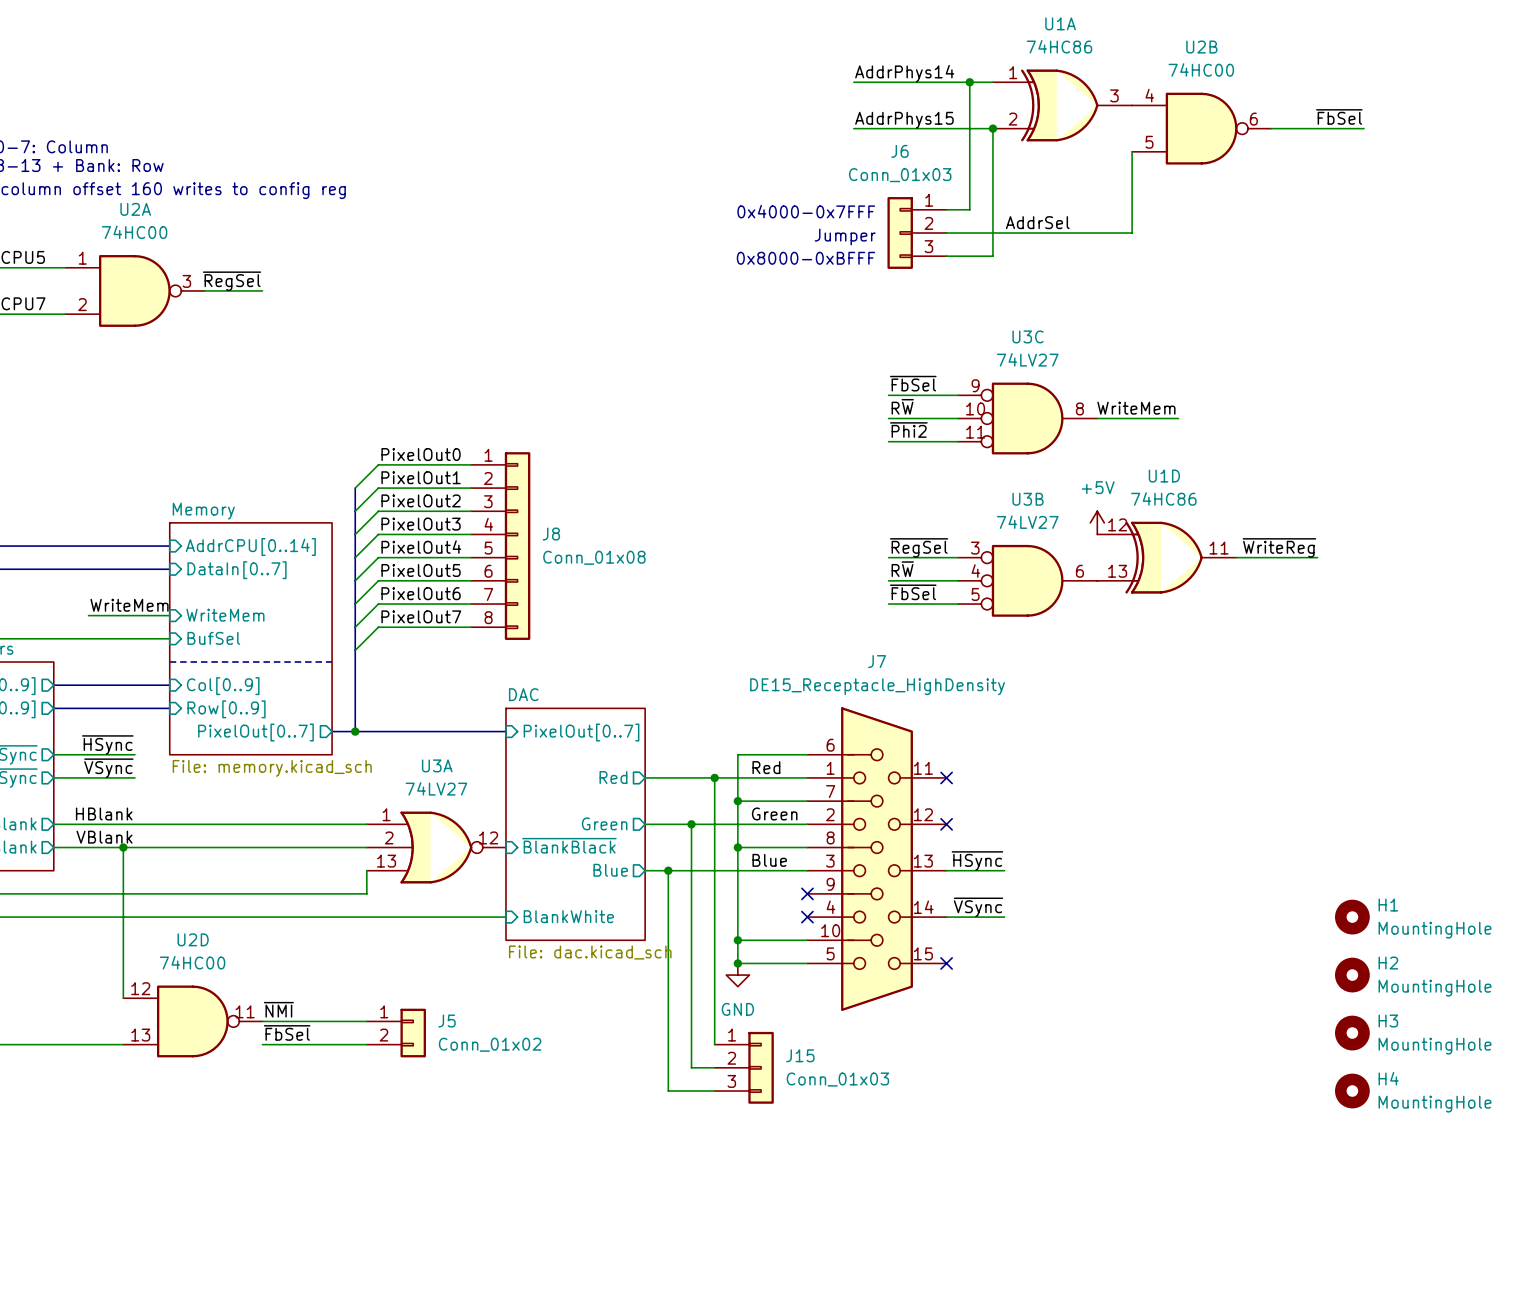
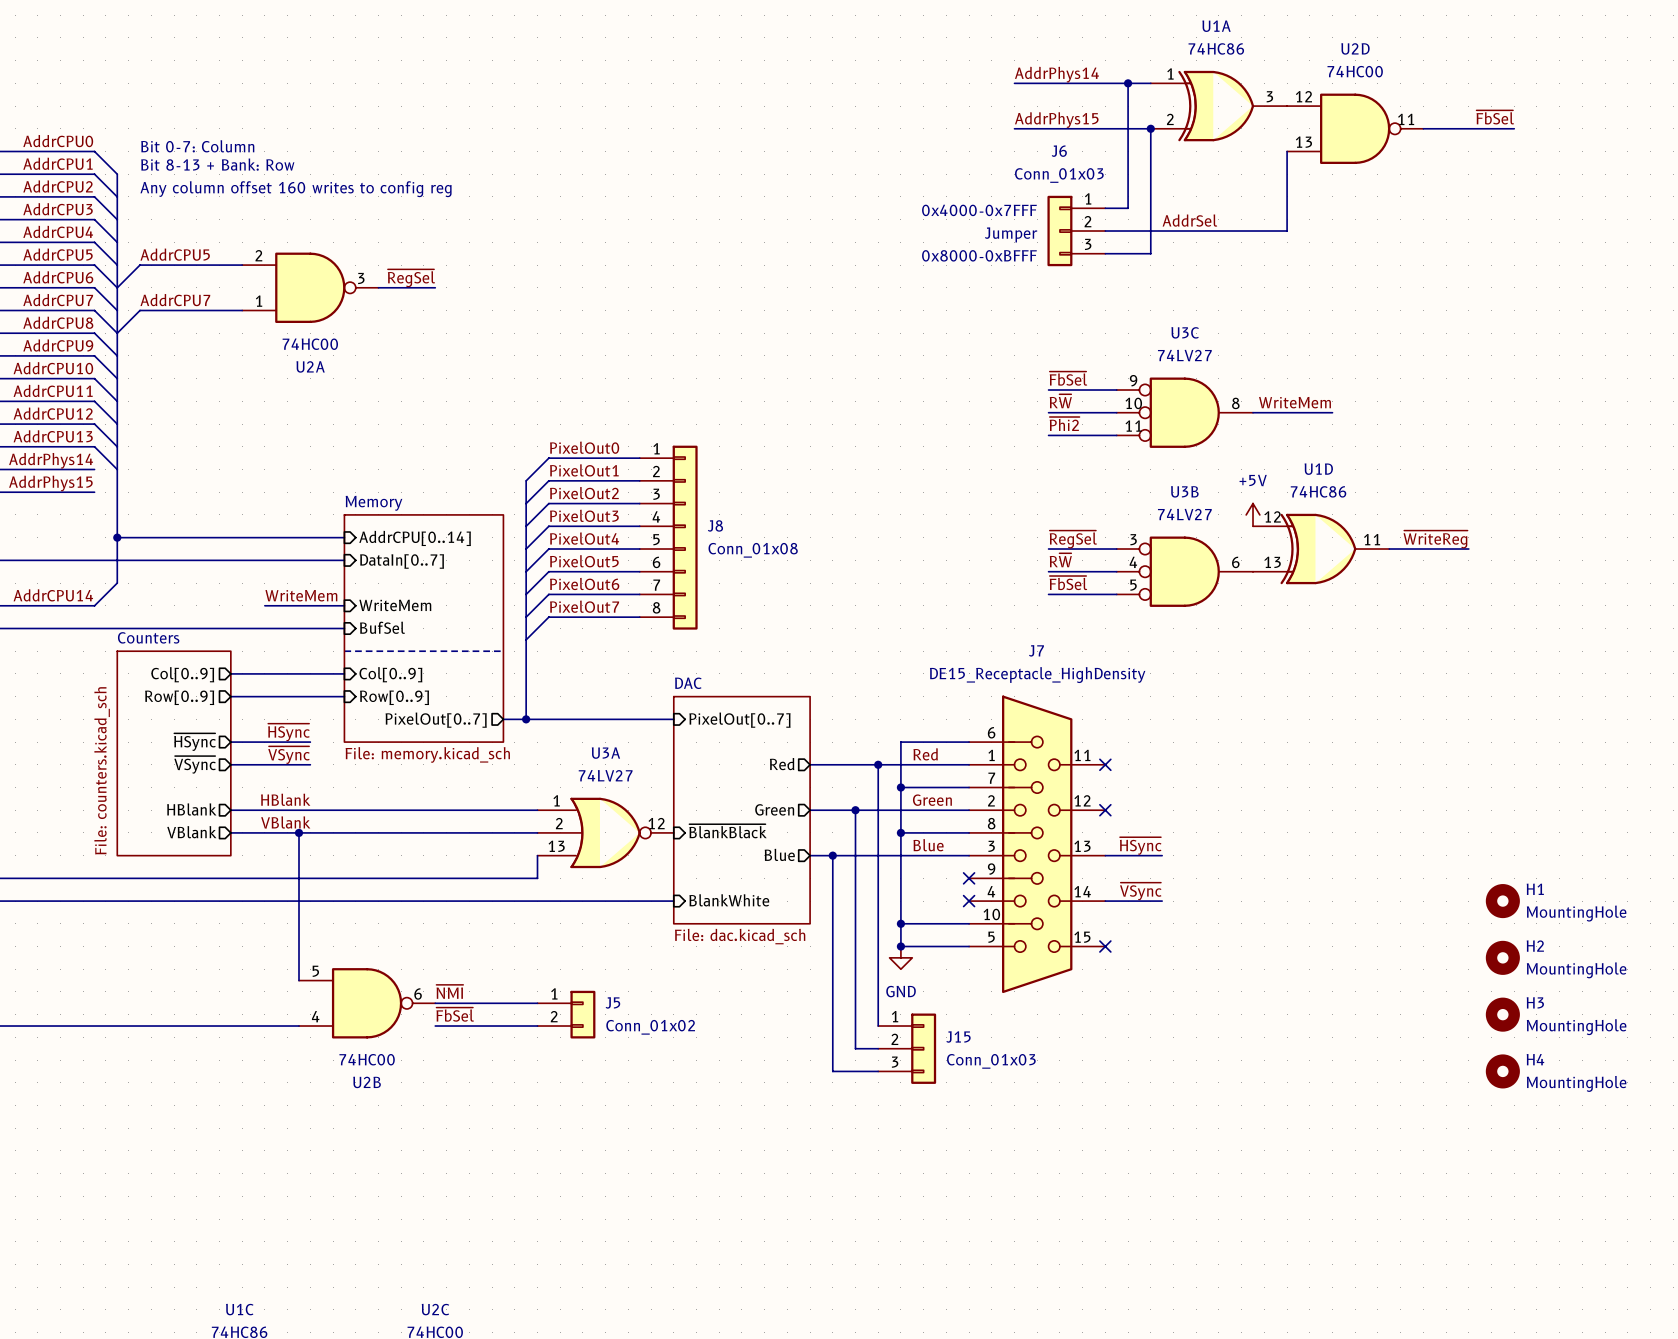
U2B flip: as is (1201, 128) -> up-down (367, 1003)
U2B position: (1201, 128) -> (367, 1003)
U2A flip: as is (134, 290) -> up-down (310, 287)
U2D position: (192, 1021) -> (1355, 128)

